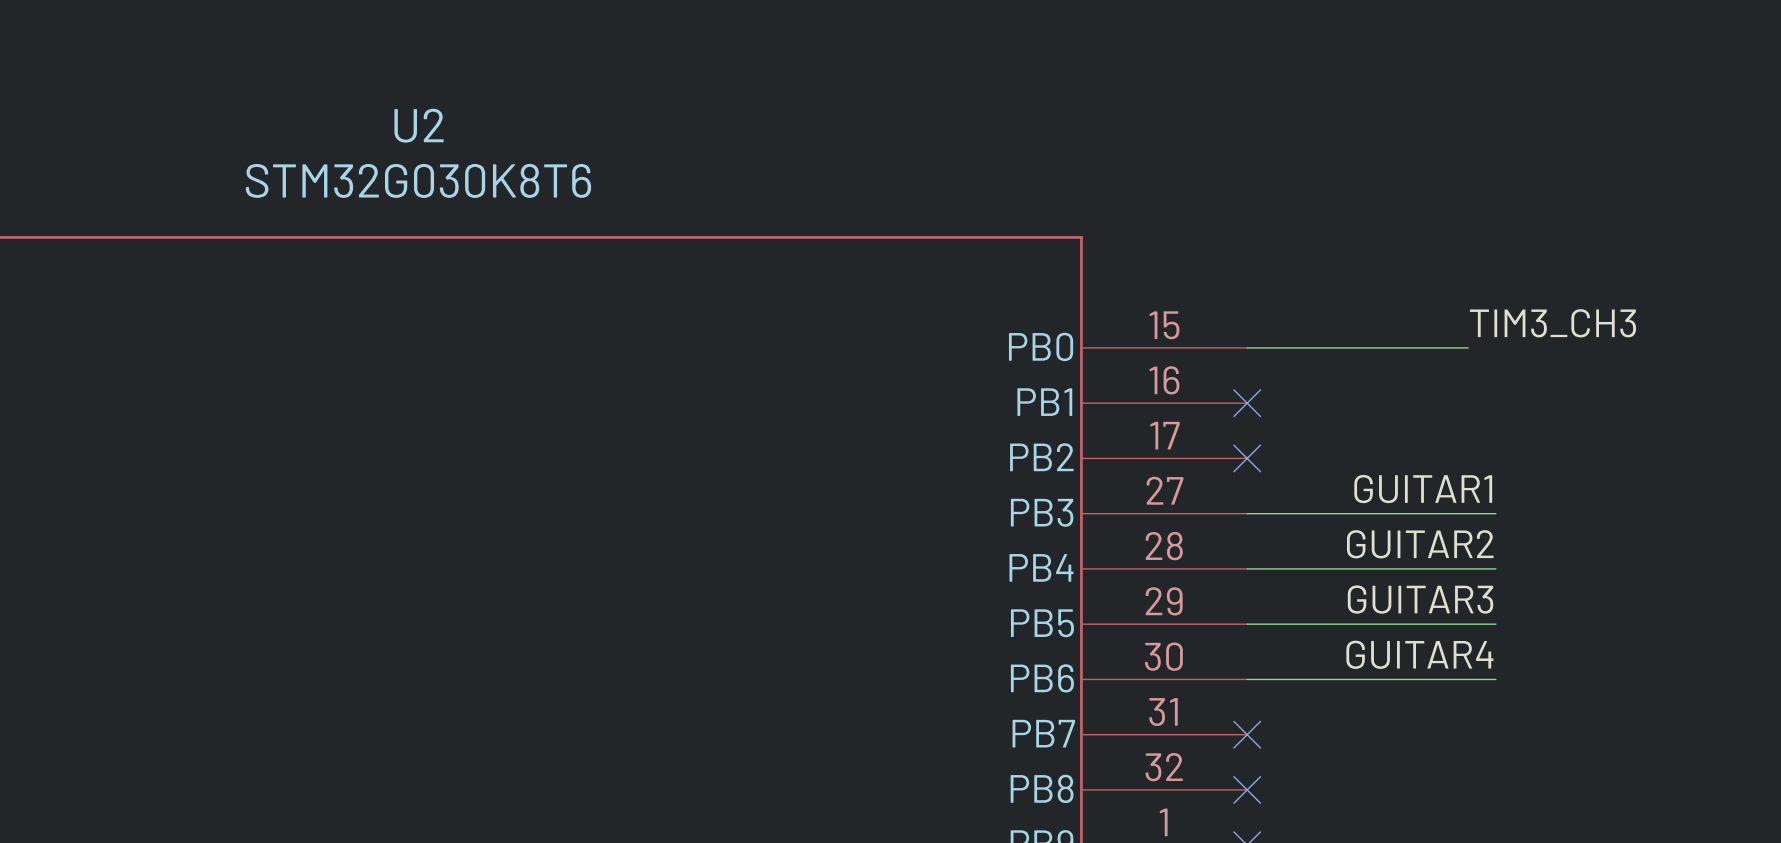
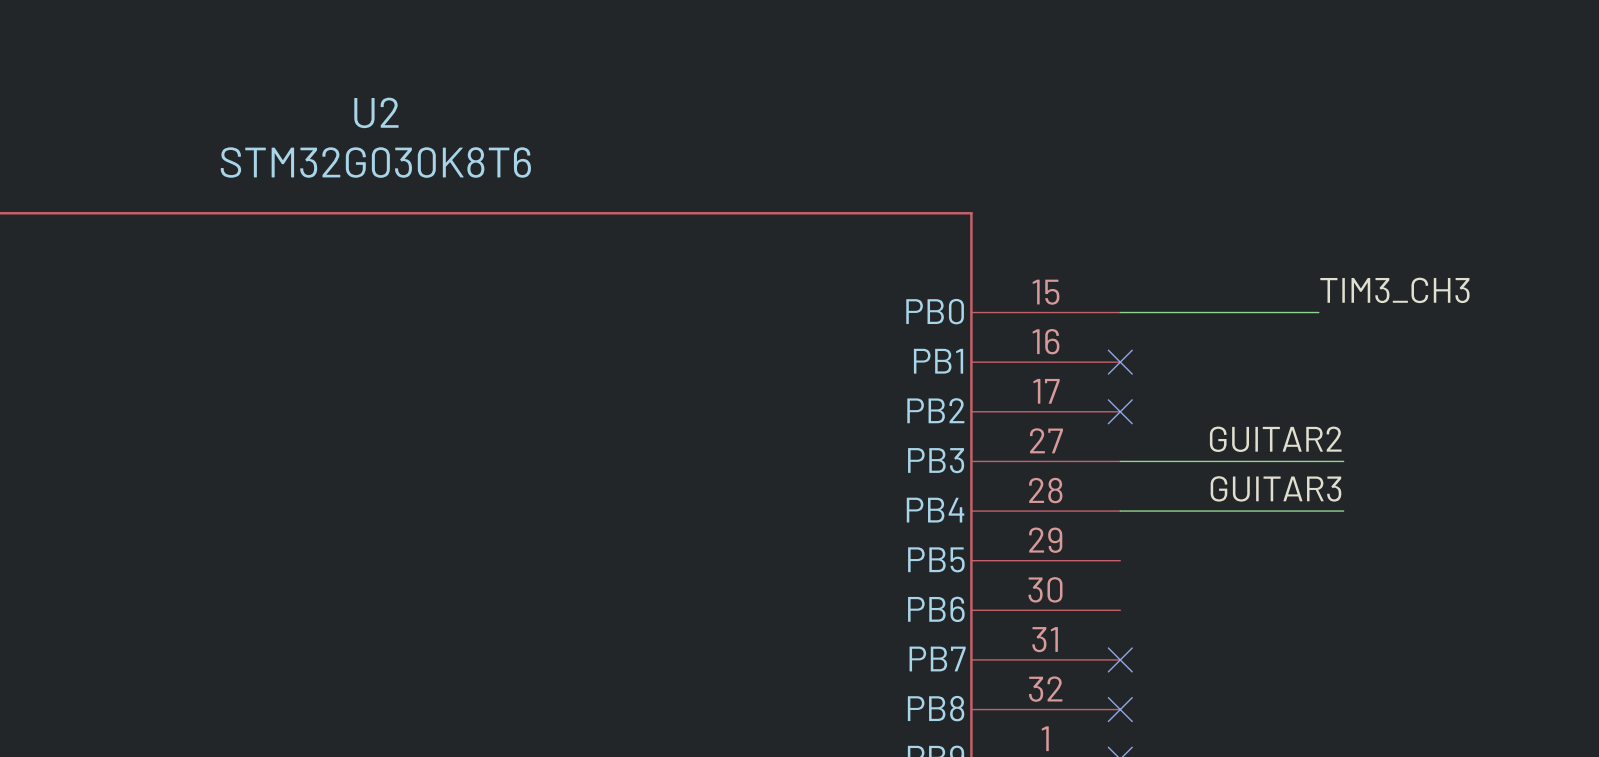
label: GUITAR1 (1423, 489) -> GUITAR2 (1275, 439)
label: GUITAR2 (1420, 544) -> GUITAR3 (1275, 488)
label: GUITAR3 (1420, 599) -> none
wire: (1247, 624) (1495, 624) -> none
label: GUITAR4 (1419, 654) -> none
wire: (1247, 679) (1495, 679) -> none

